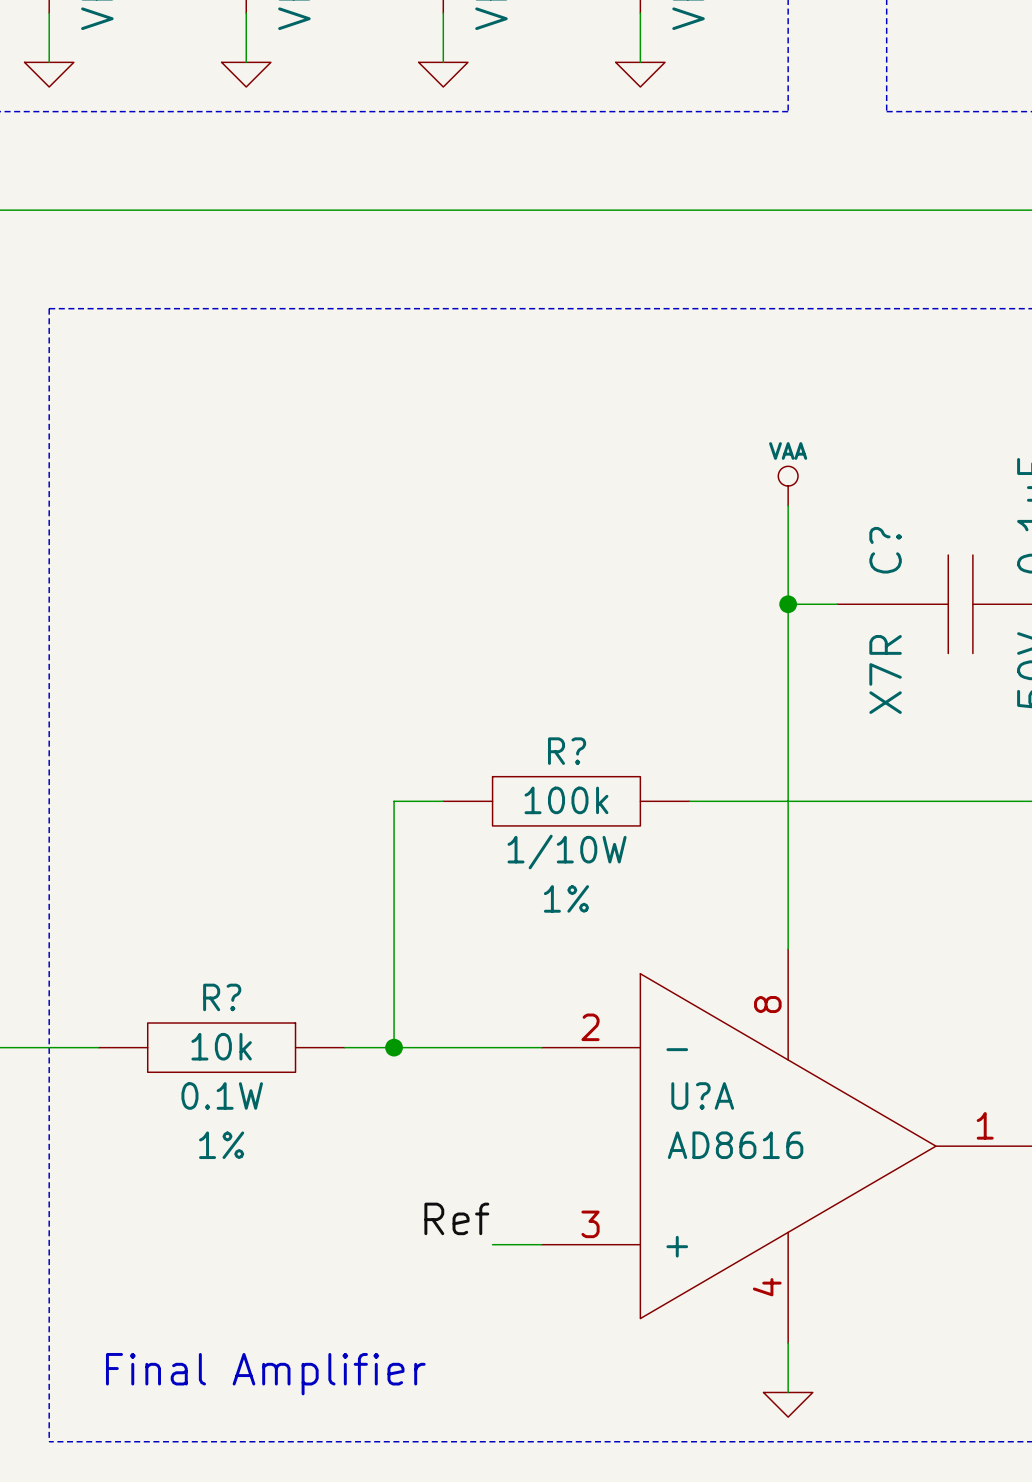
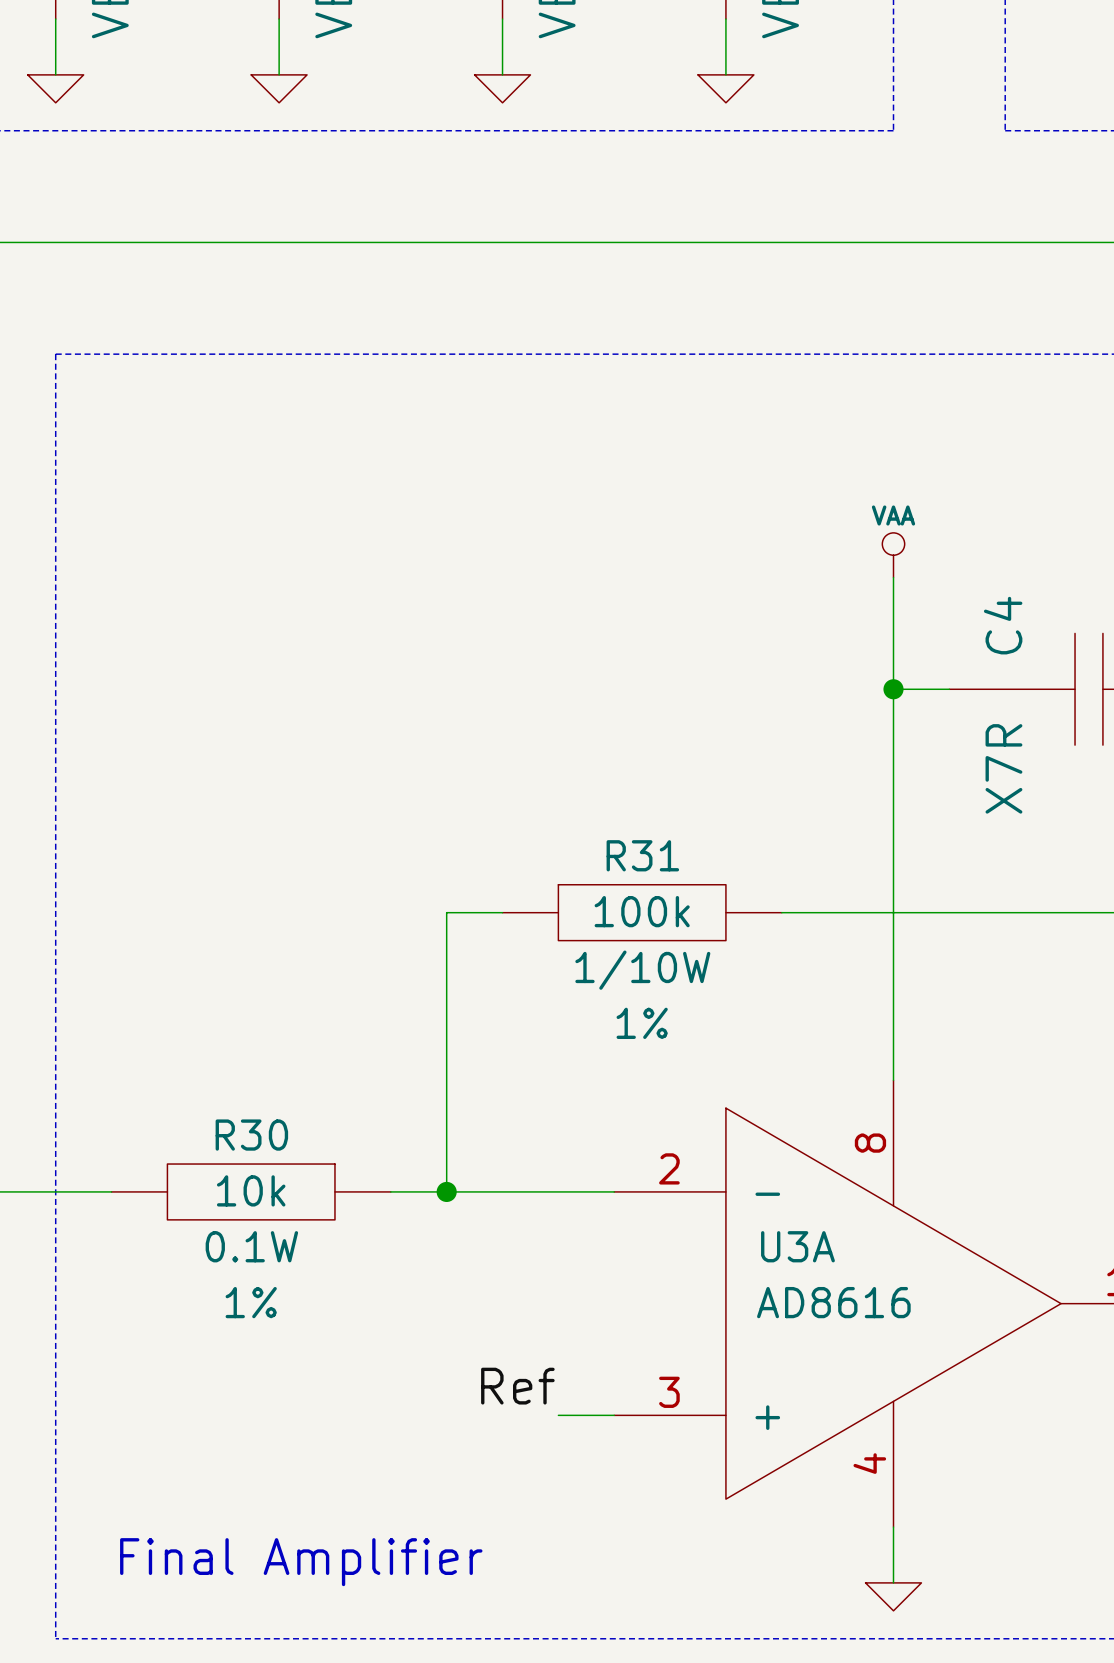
C? name: C? (885, 550) -> C4 (1003, 625)
R? name: R? (567, 751) -> R31 (642, 855)
R? name: R? (222, 997) -> R30 (251, 1135)
U?A name: U?A (702, 1095) -> U3A (797, 1246)

